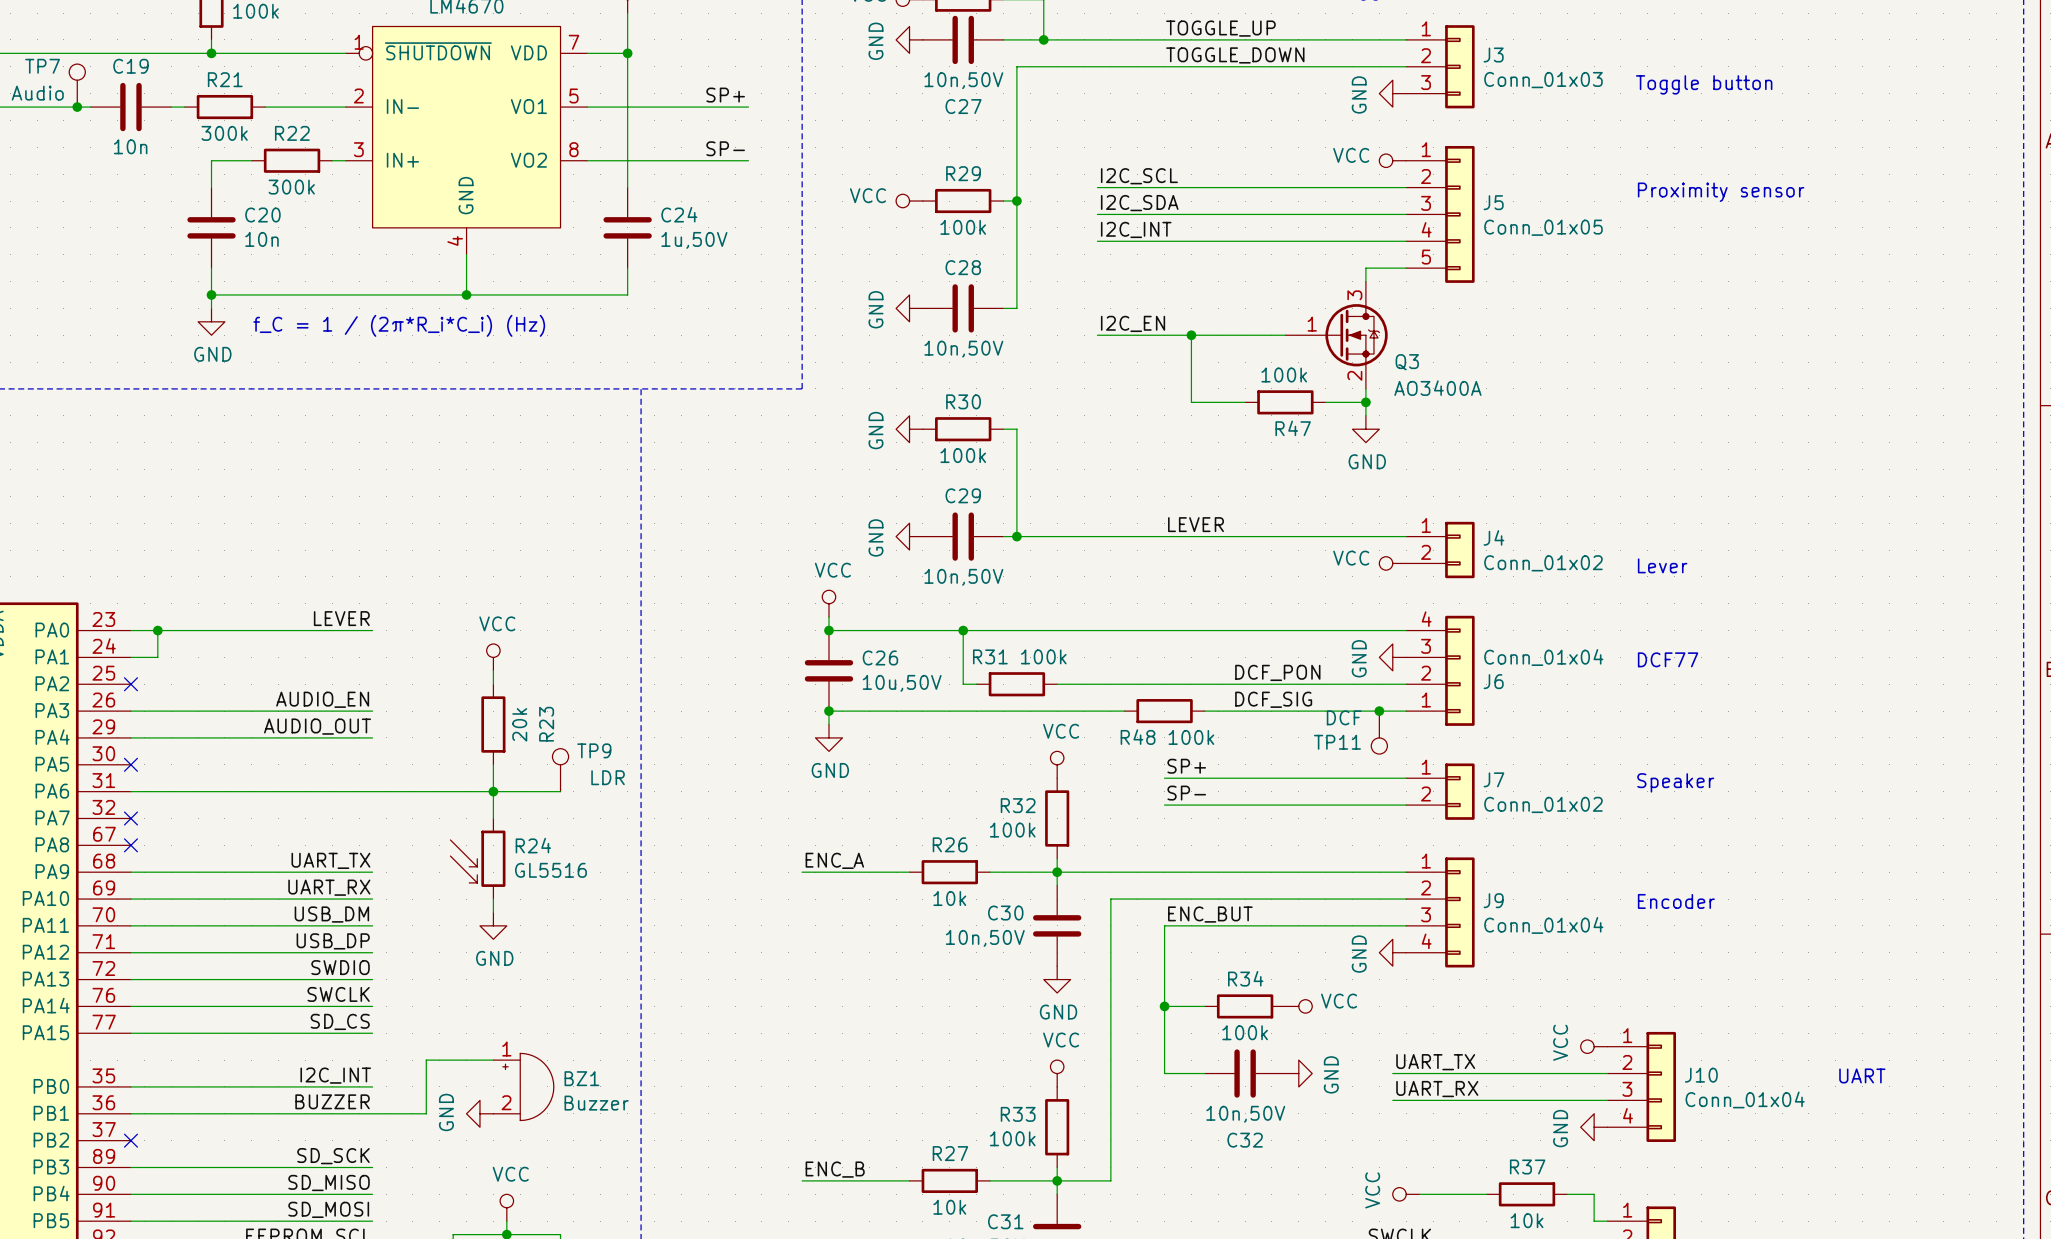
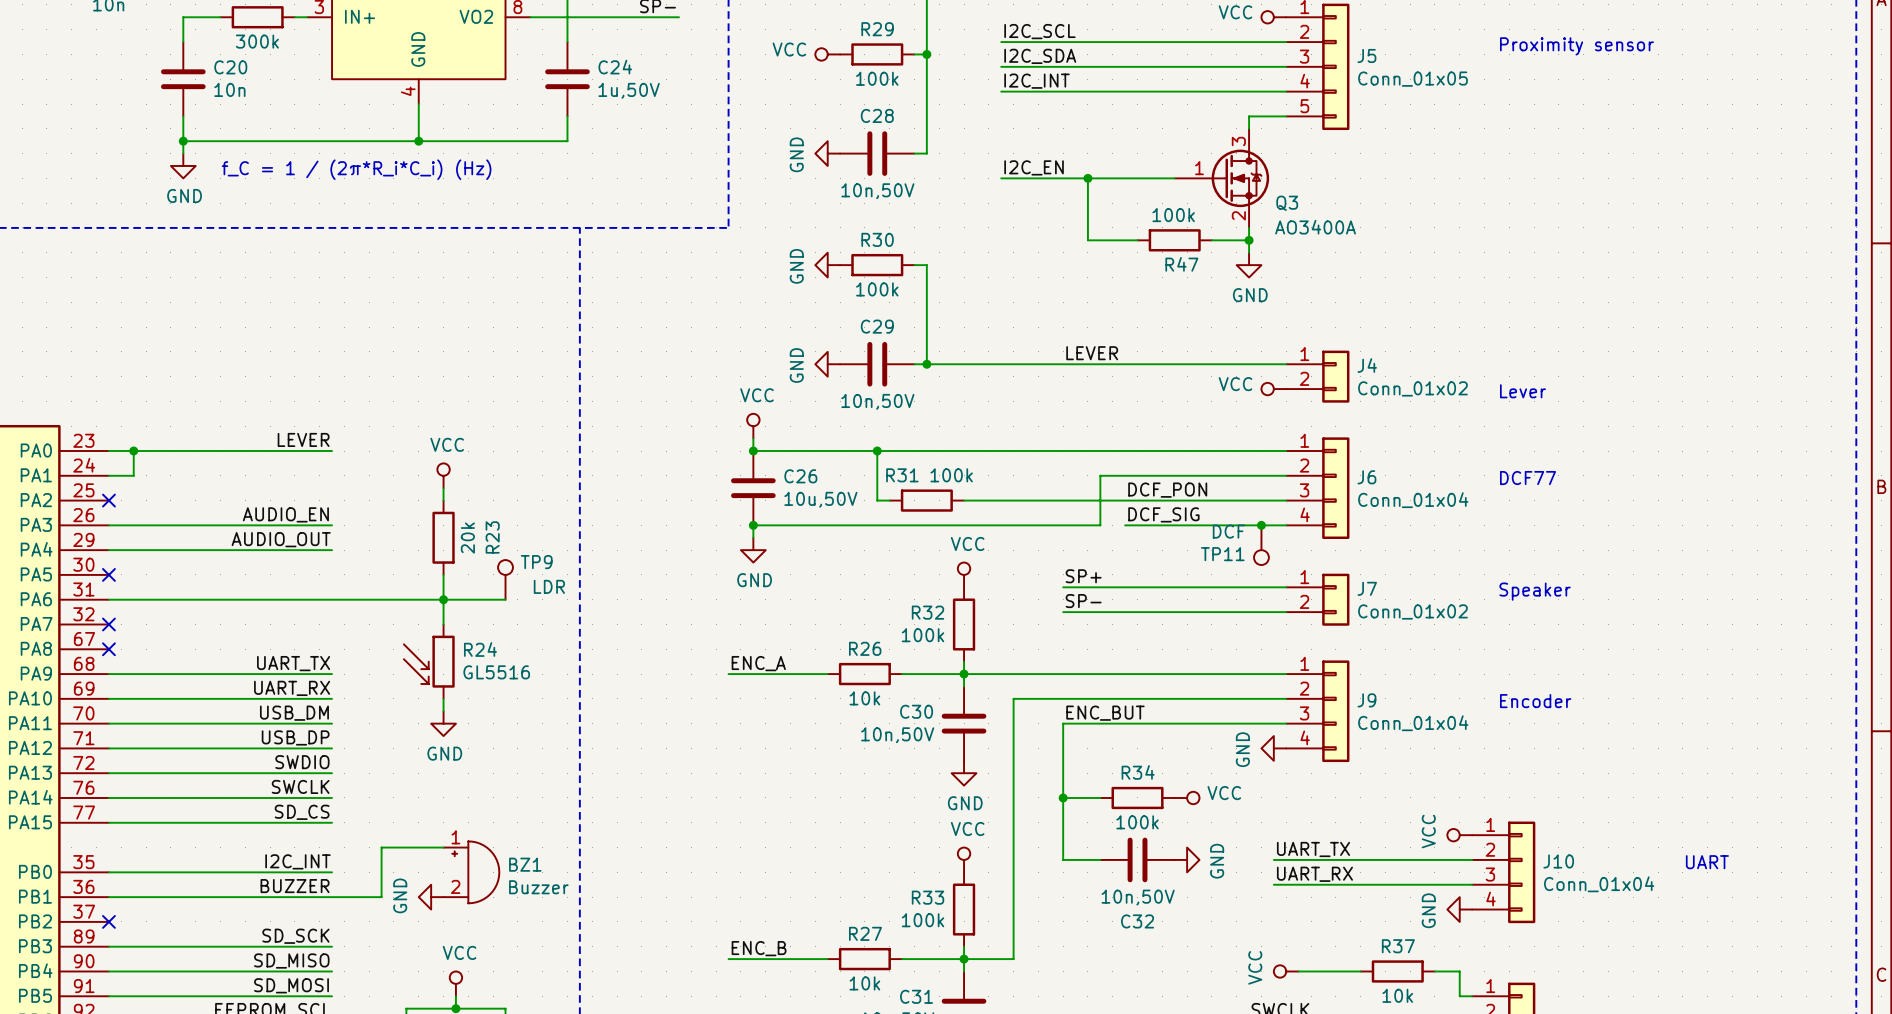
power symbol: GND (1392, 657) -> none
wire: none -> (1286, 475) (1100, 475) (1100, 525) (1026, 525)
J6 flip: as is (1459, 670) -> up-down (1335, 488)
R48: 100k (1164, 711) -> none
wire: (1204, 711) (1231, 711) -> none

